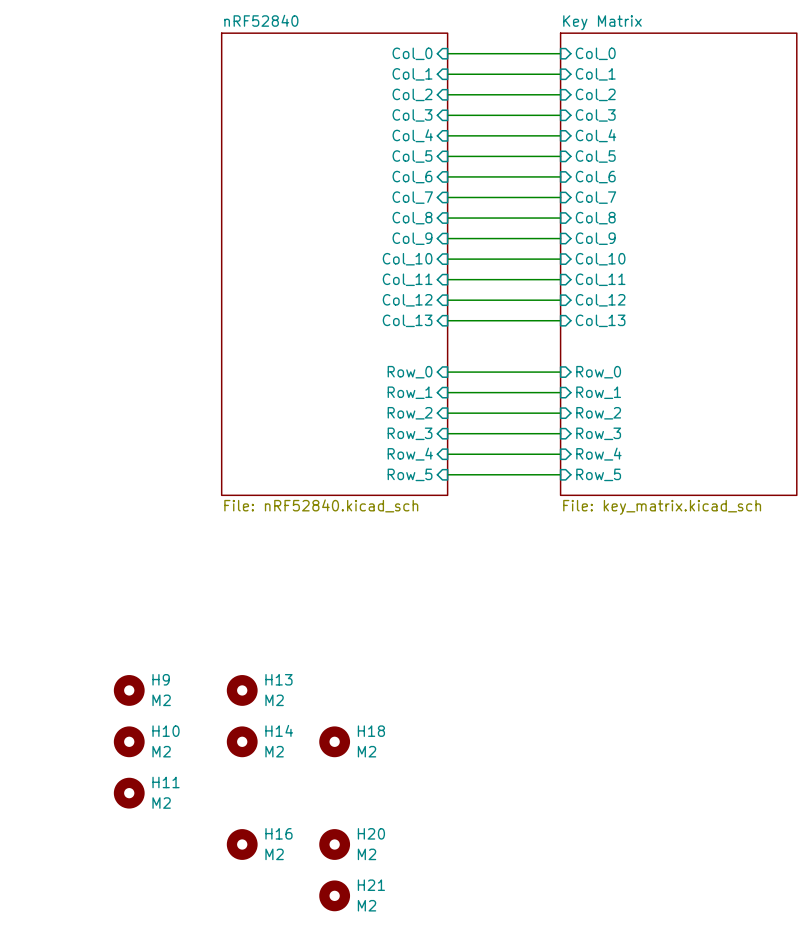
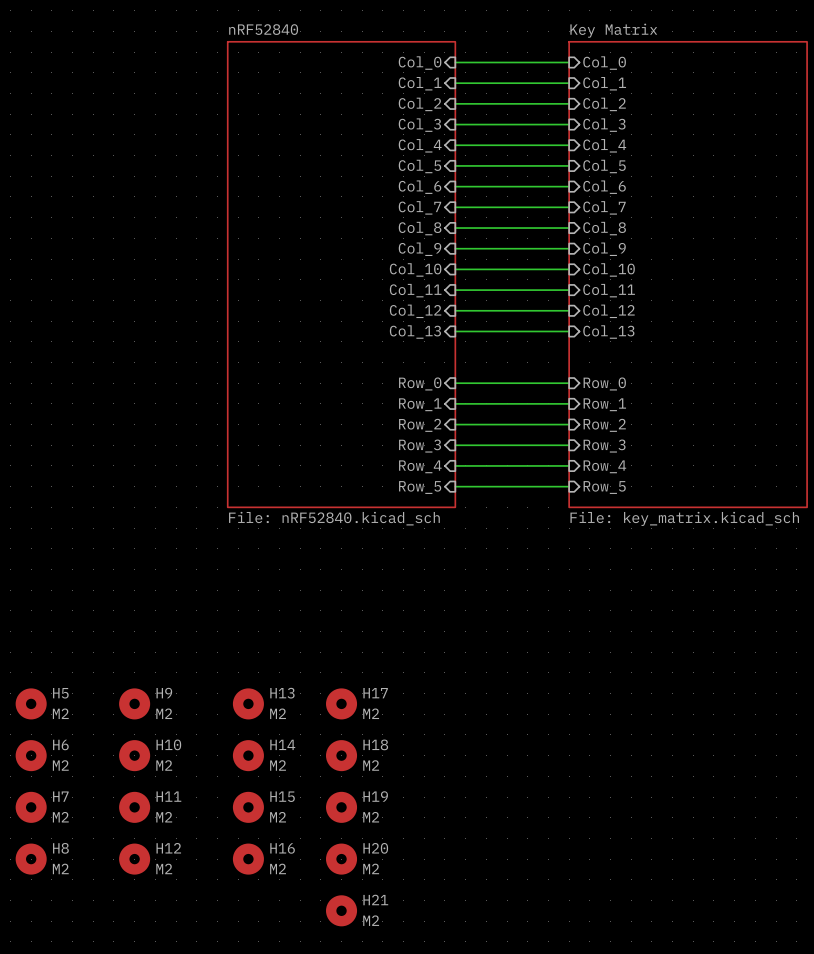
H5: none -> M2 (31, 703)
H17: none -> M2 (341, 703)
H6: none -> M2 (31, 755)
H7: none -> M2 (31, 807)
H15: none -> M2 (248, 807)
H19: none -> M2 (341, 807)
H8: none -> M2 (31, 859)
H12: none -> M2 (134, 859)

